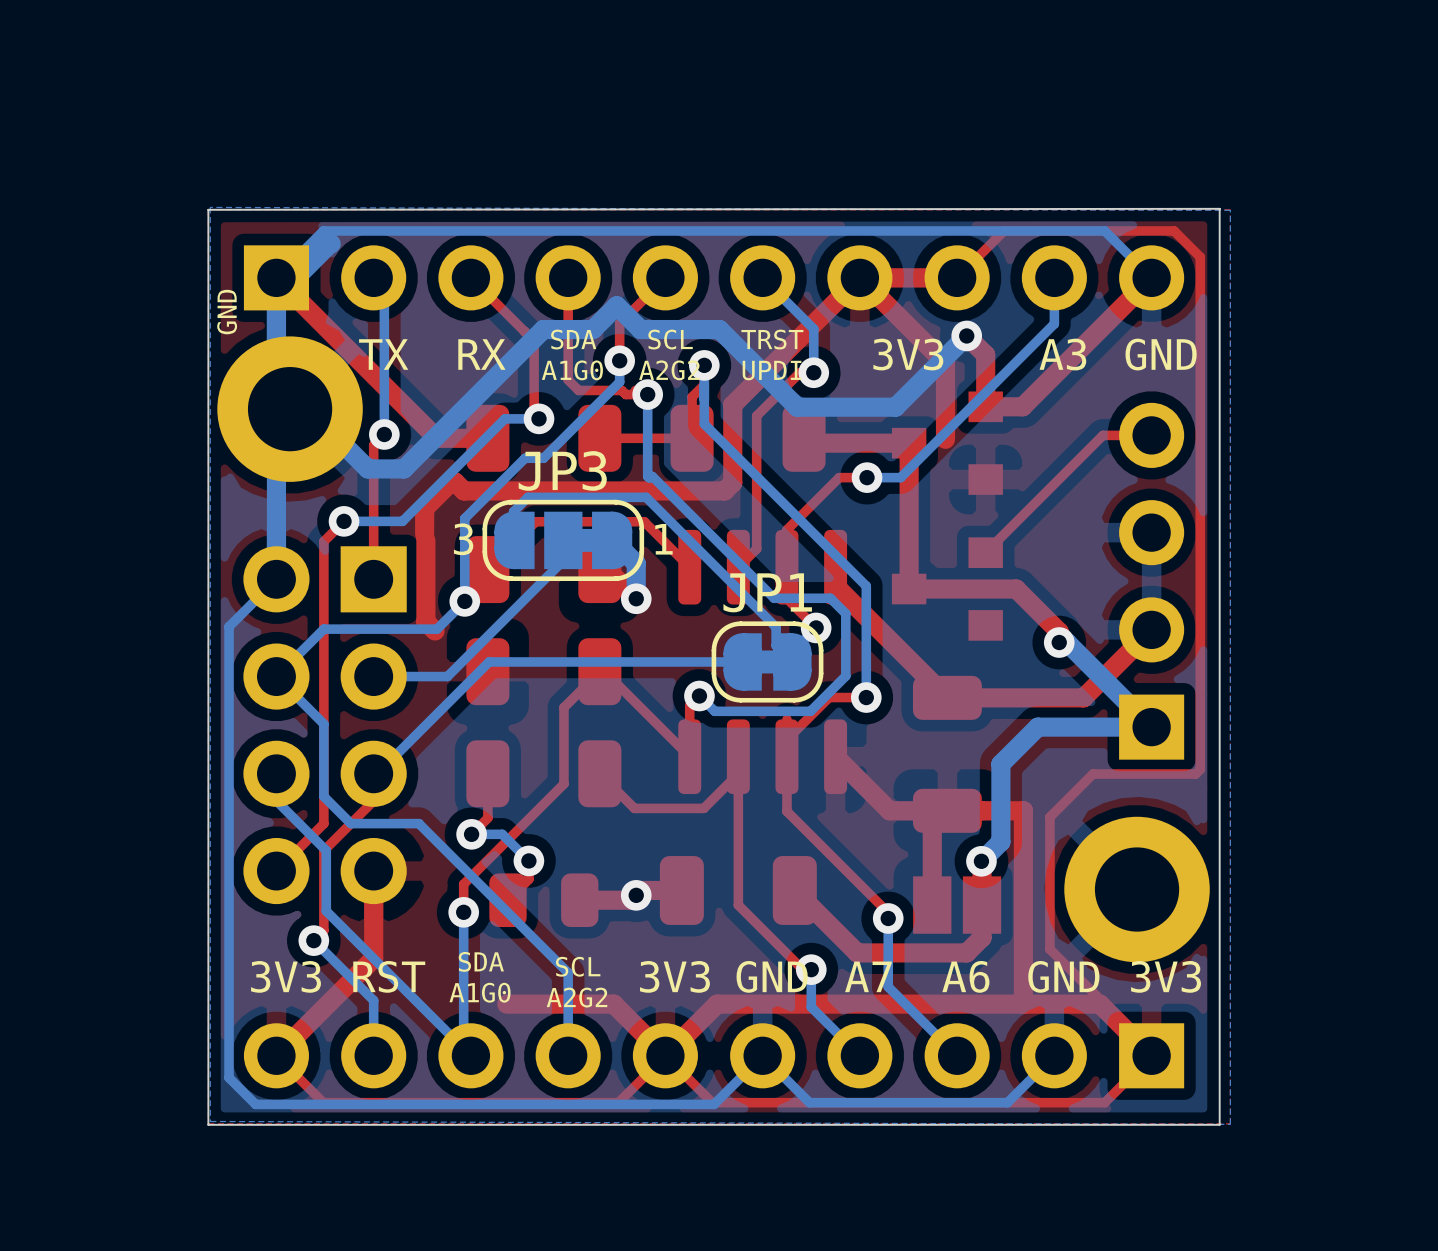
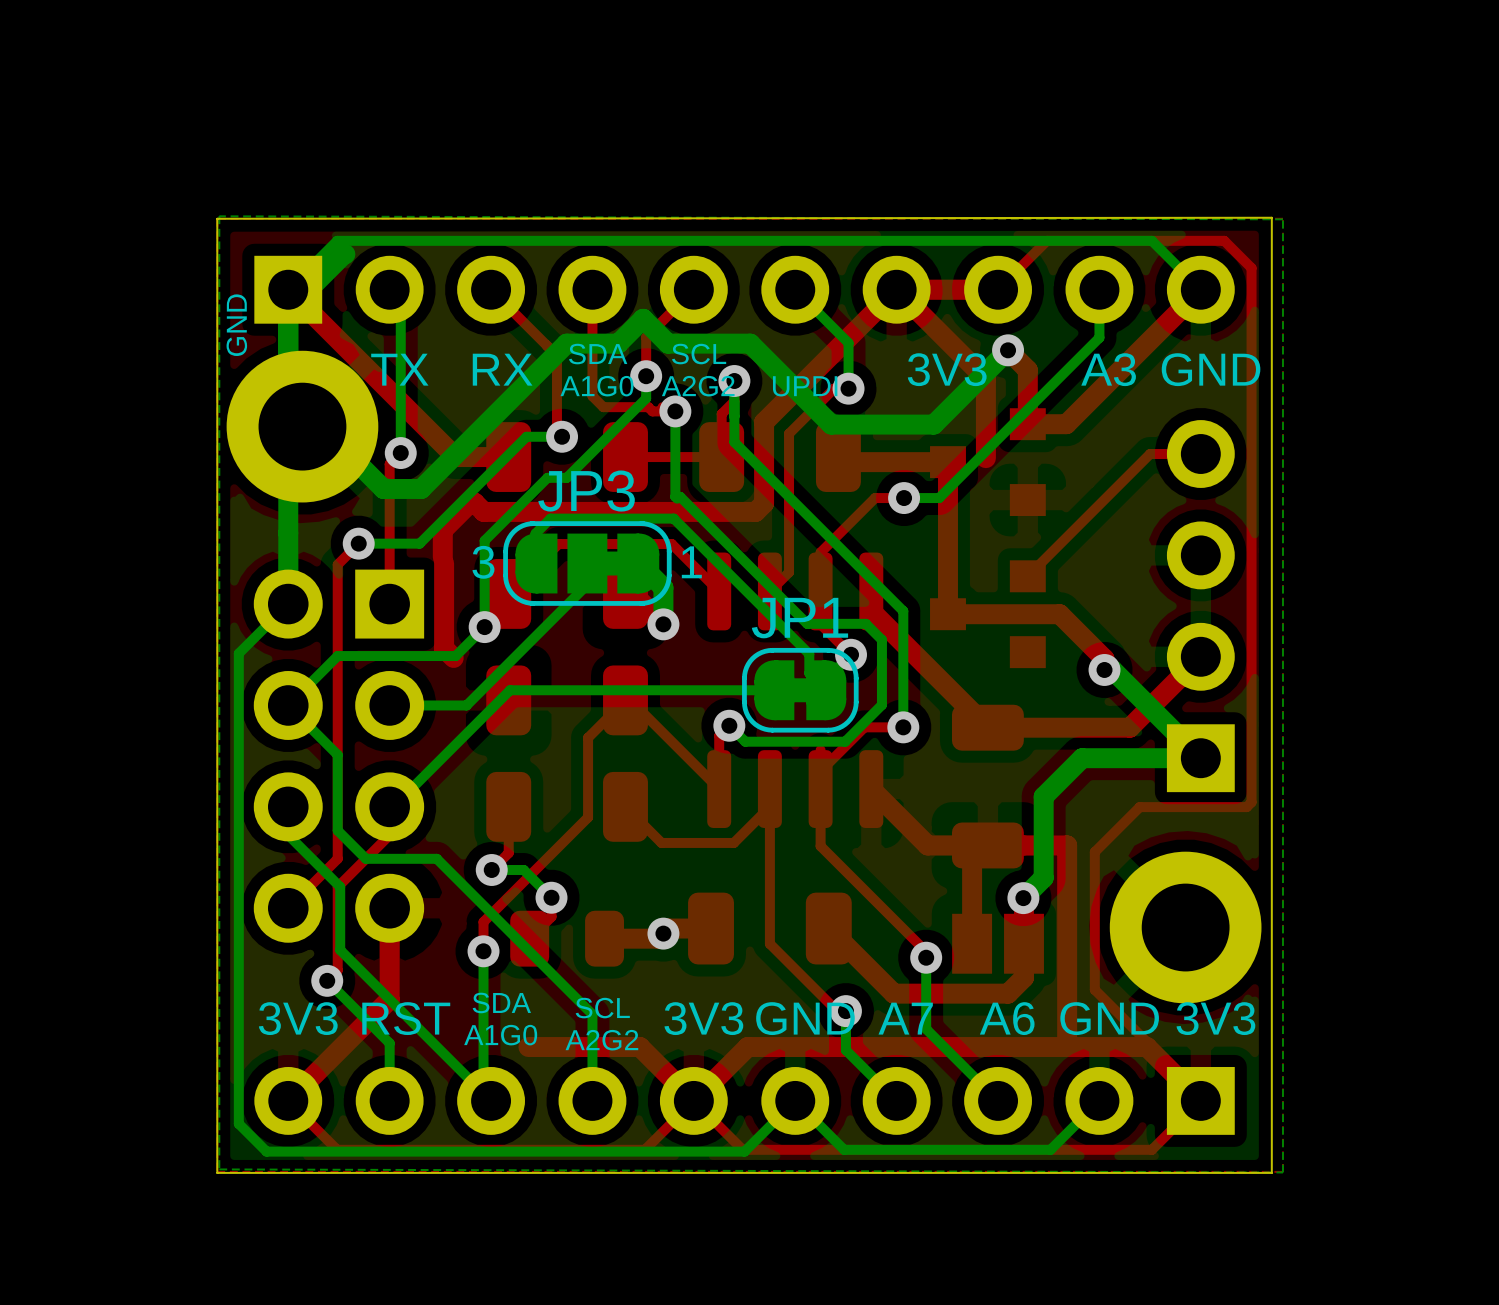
text: TRST (772, 339) -> none

